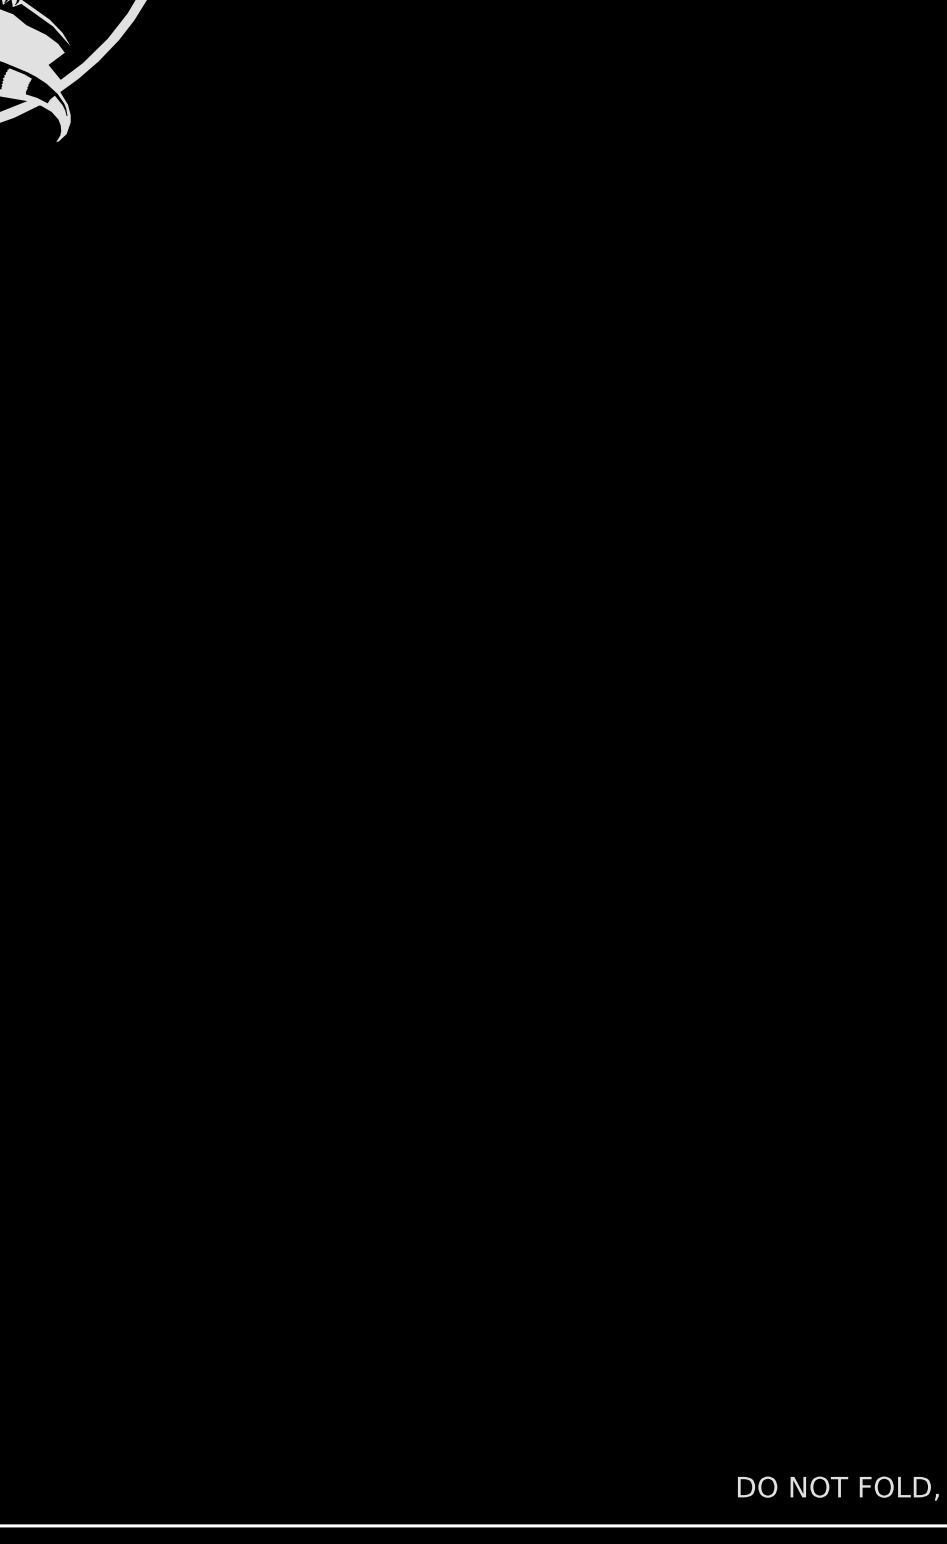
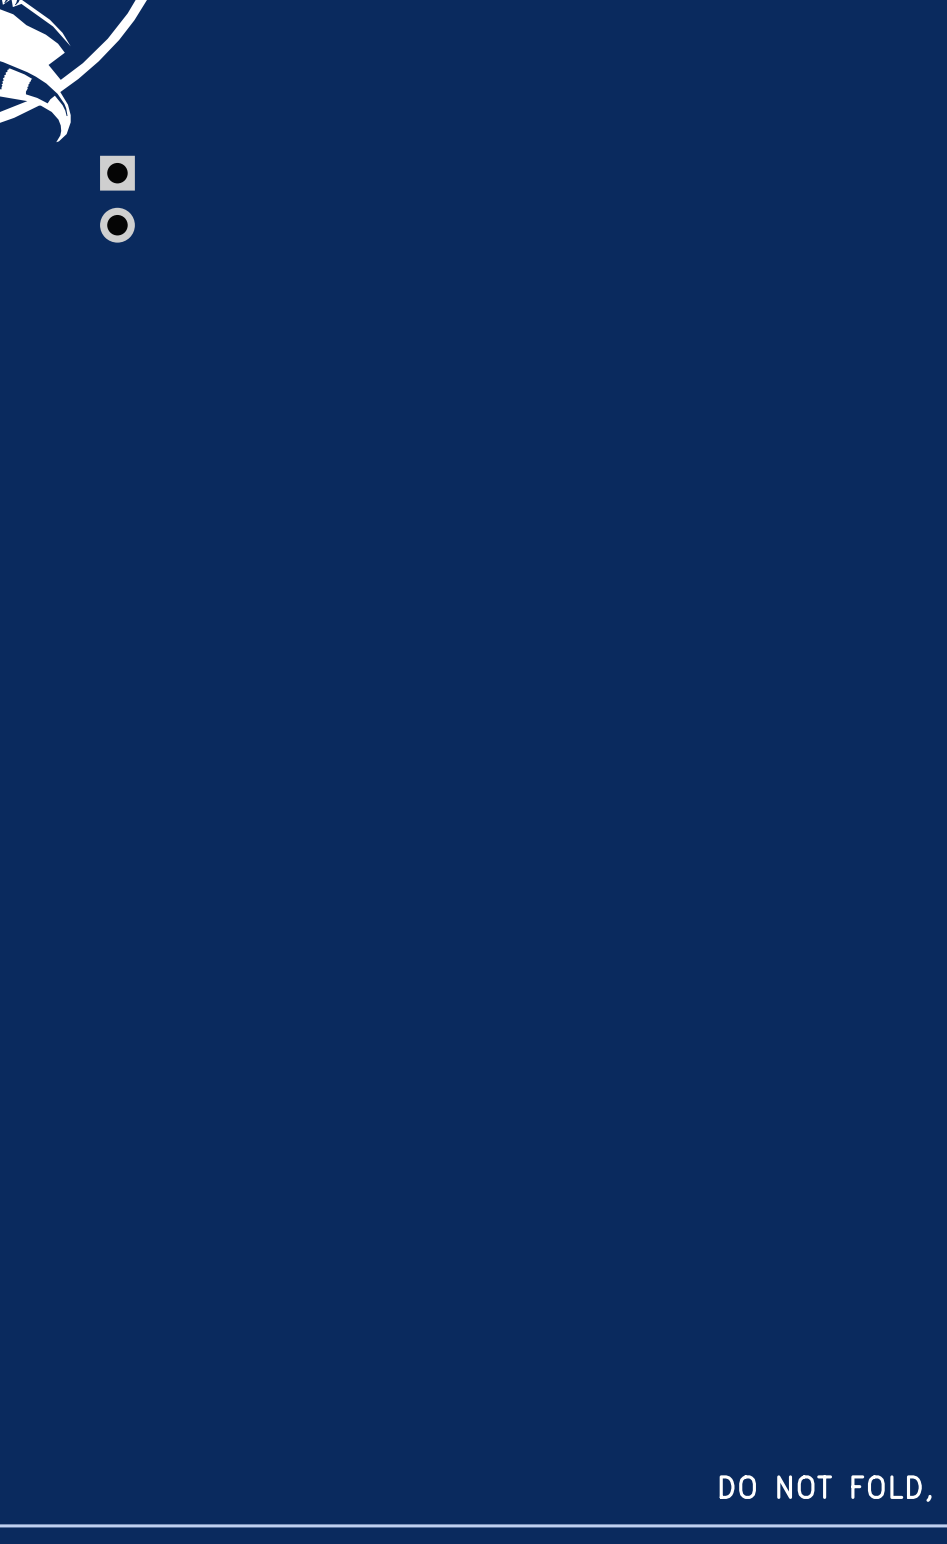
part: none -> (117, 199)

